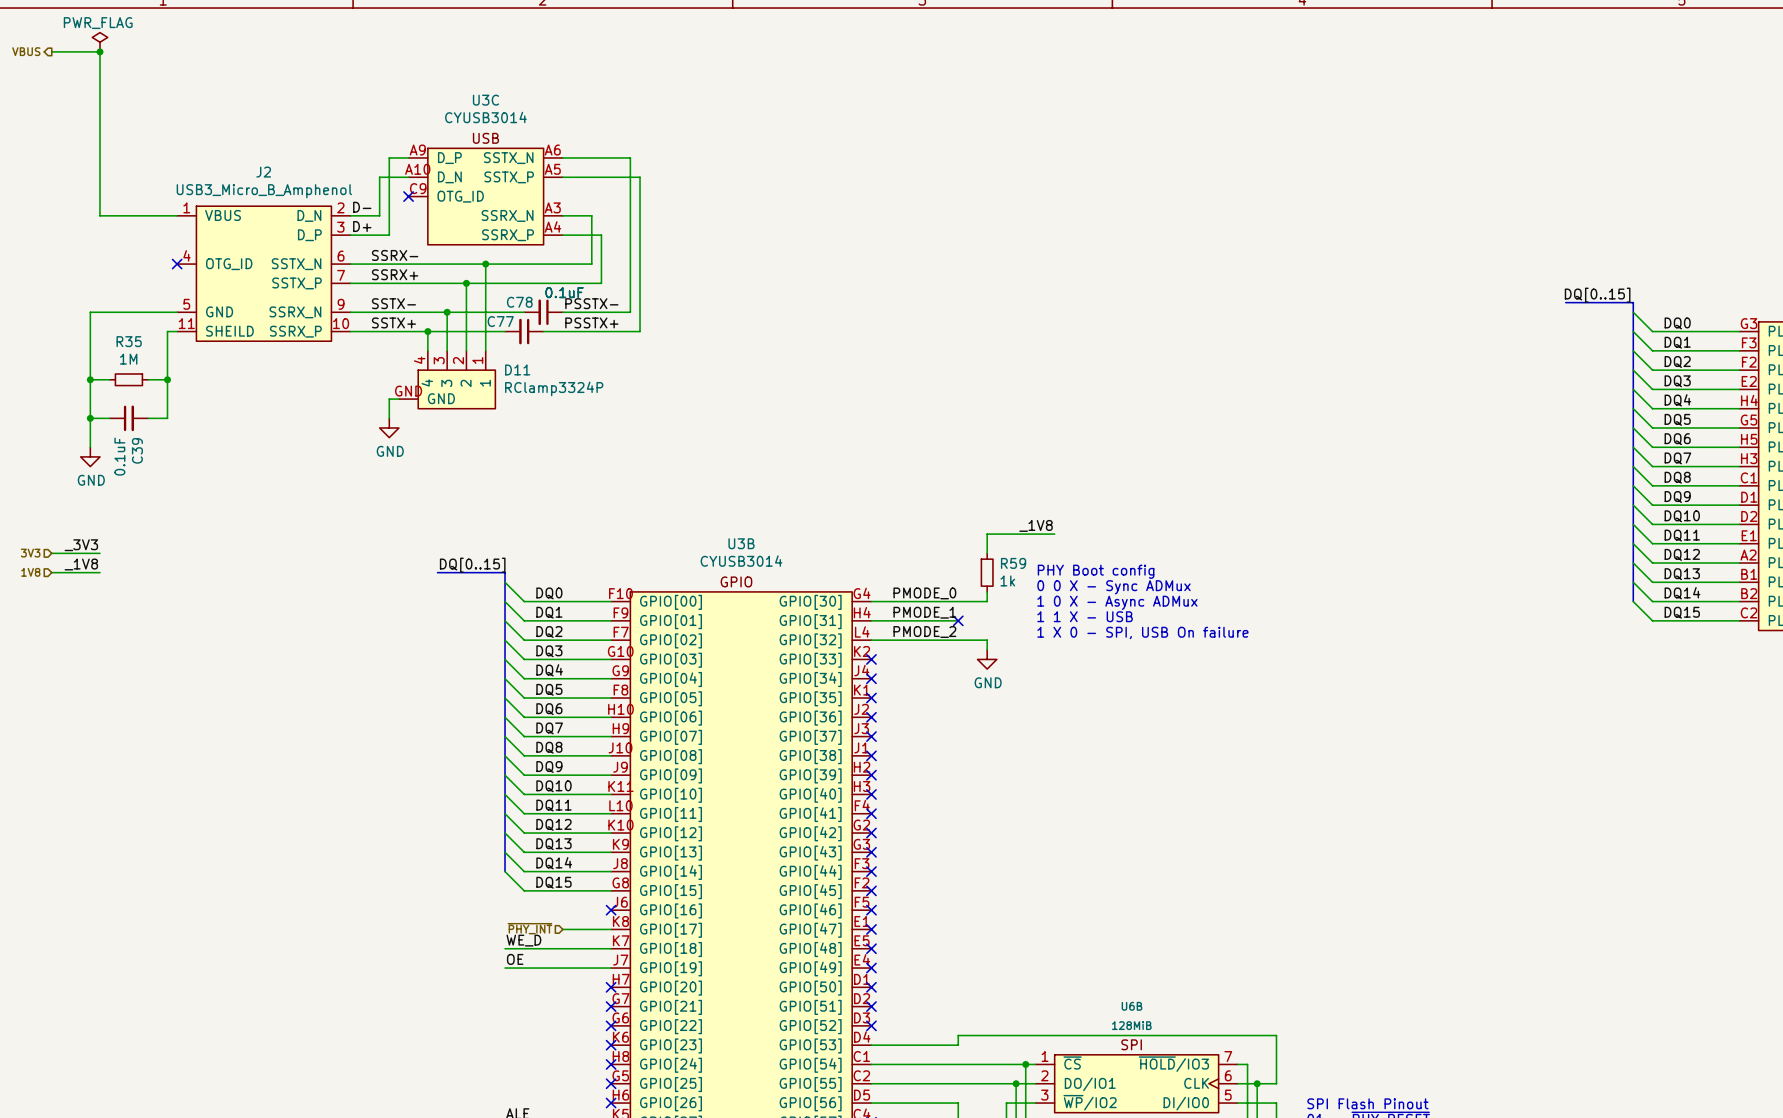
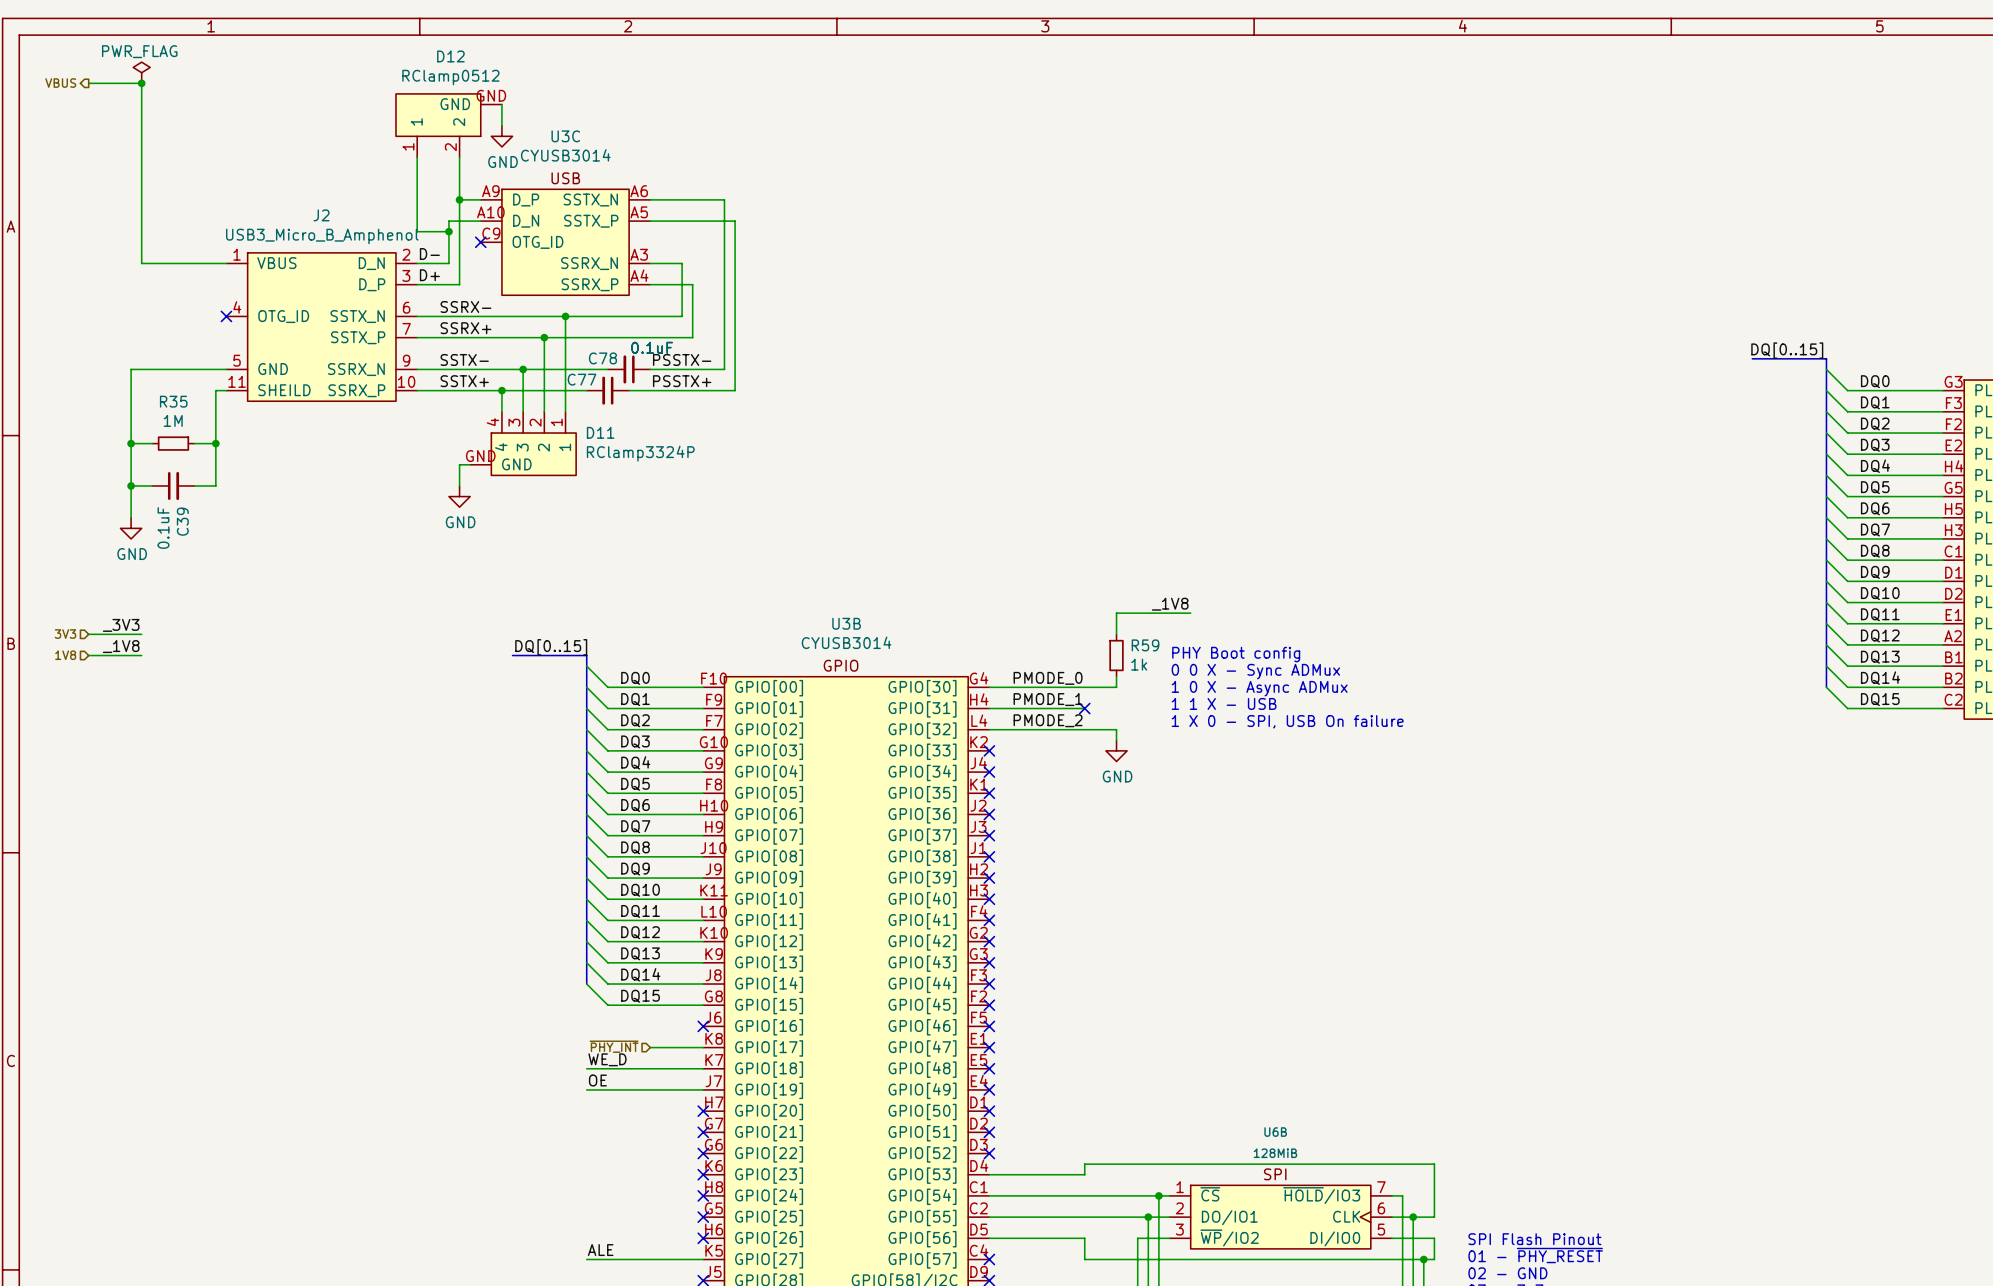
wire: none -> (501, 104) (501, 125)
D12: none -> RClamp0512 (448, 125)
power symbol: none -> GND (501, 136)
wire: none -> (417, 157) (417, 231) (448, 231)
wire: none -> (459, 157) (459, 199)
junction: none -> (459, 199)
junction: none -> (448, 231)

